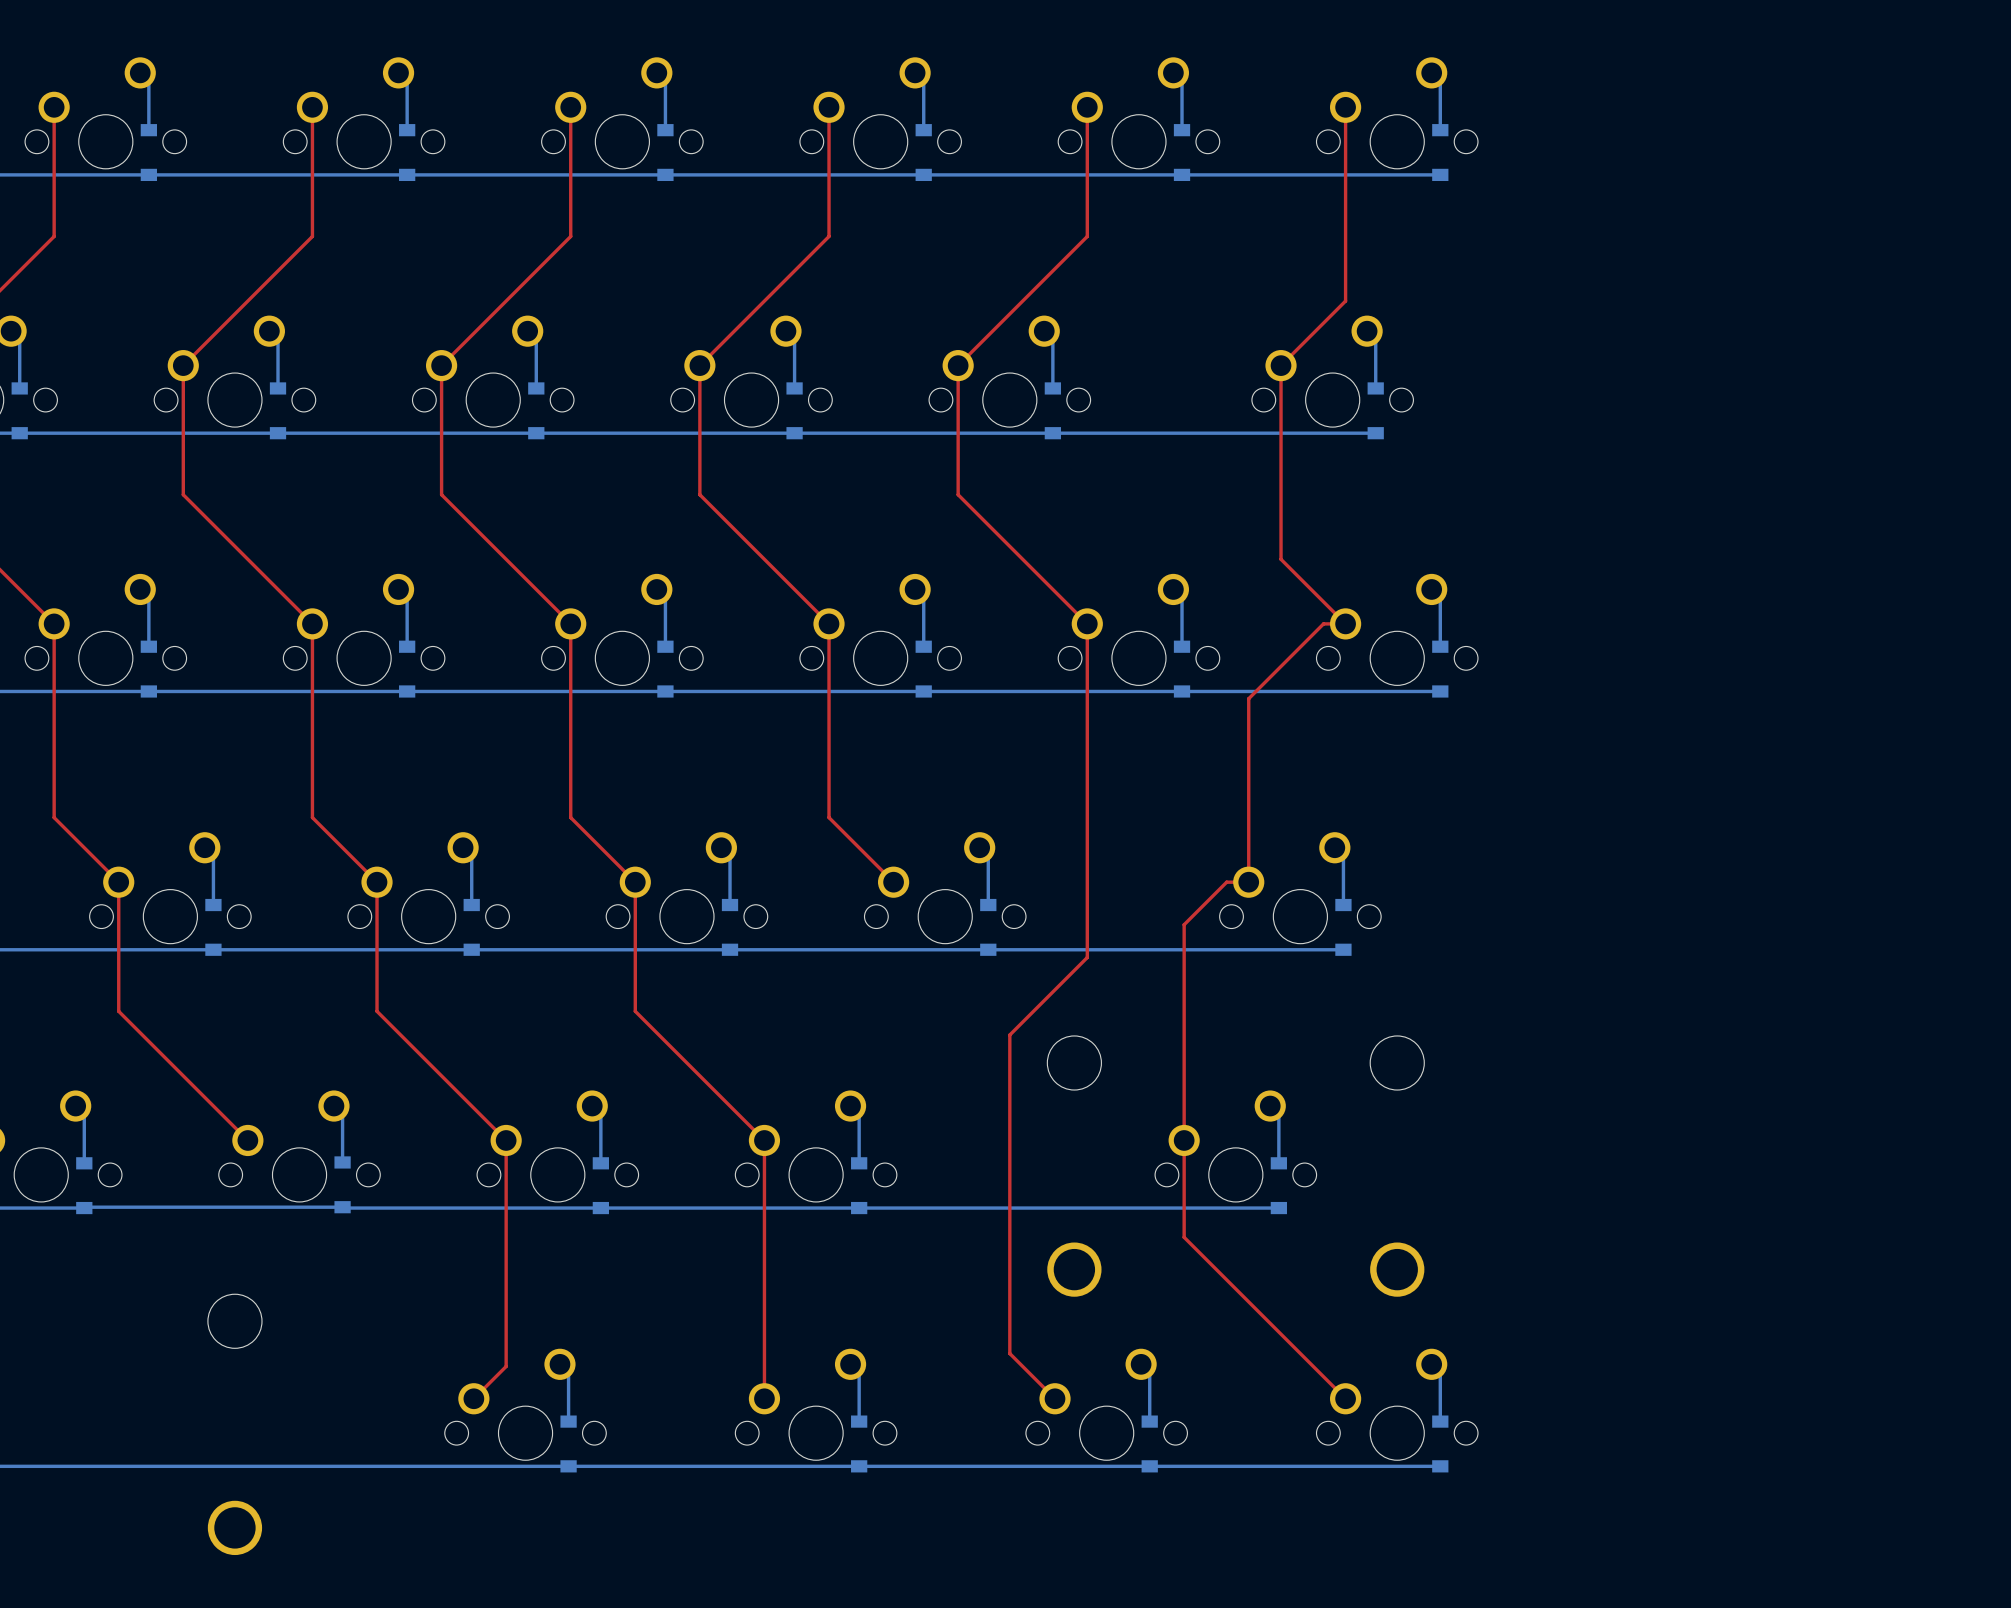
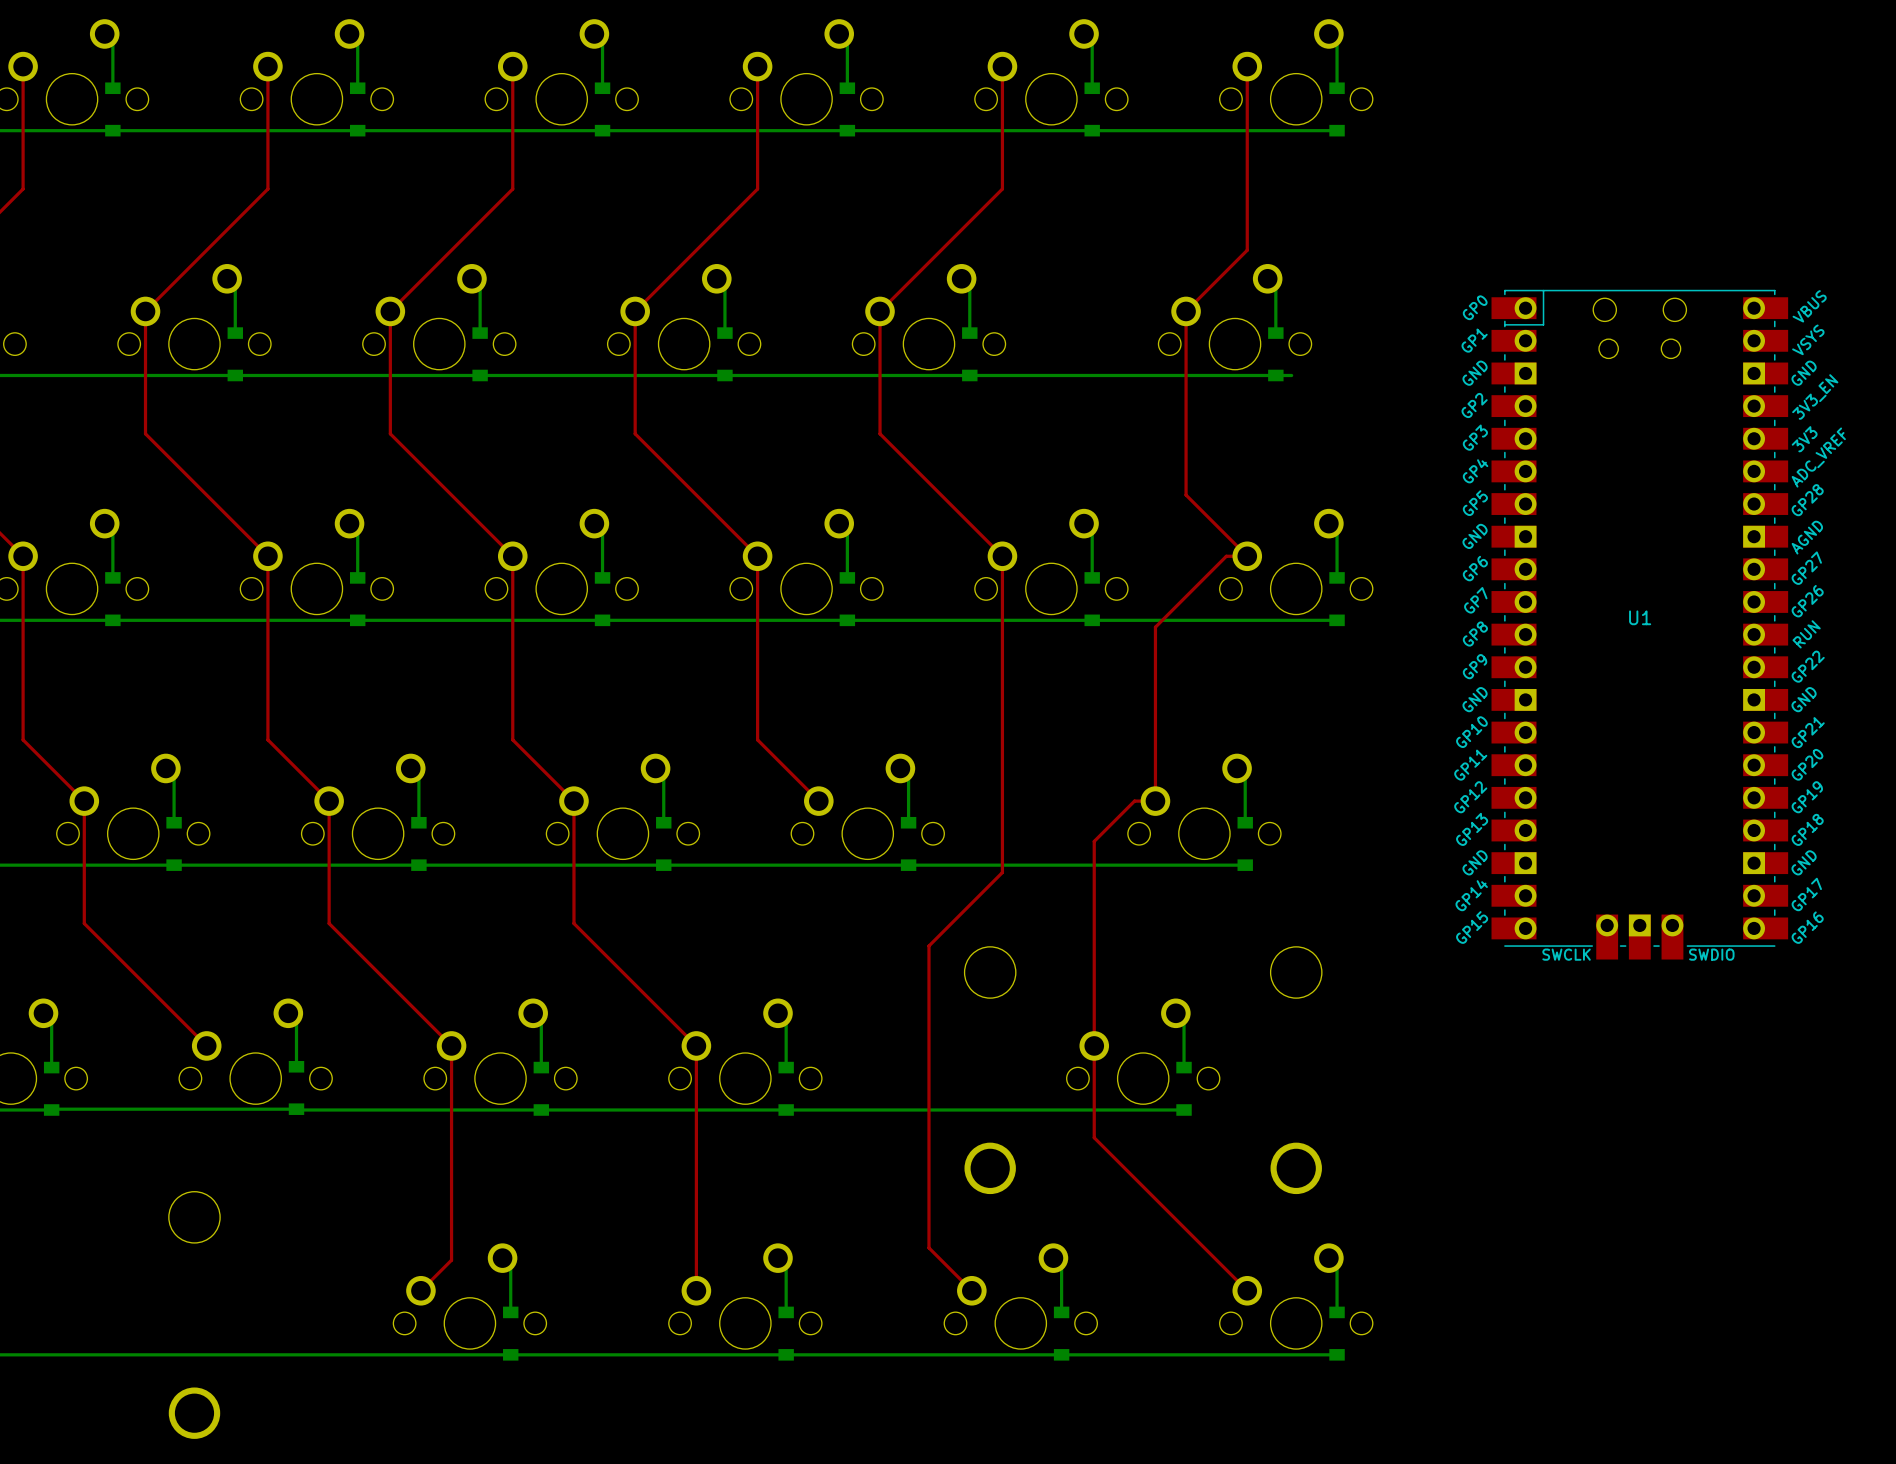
bottom track: none -> (1275, 375) (1291, 375)
U1: none -> (1639, 624)

